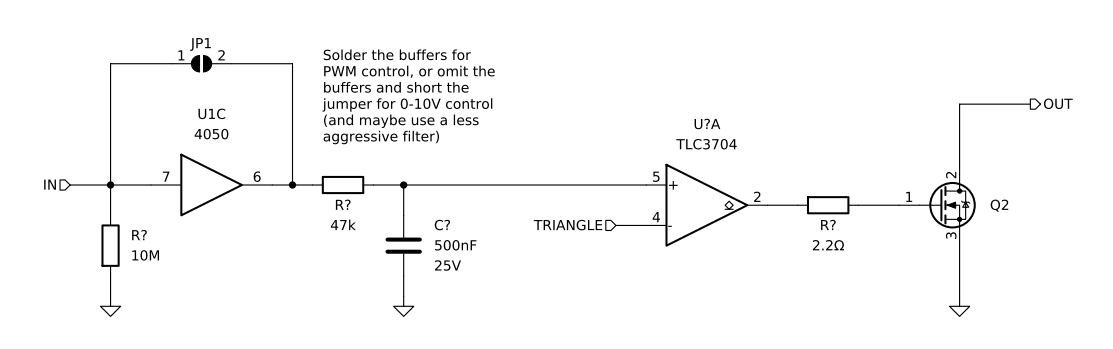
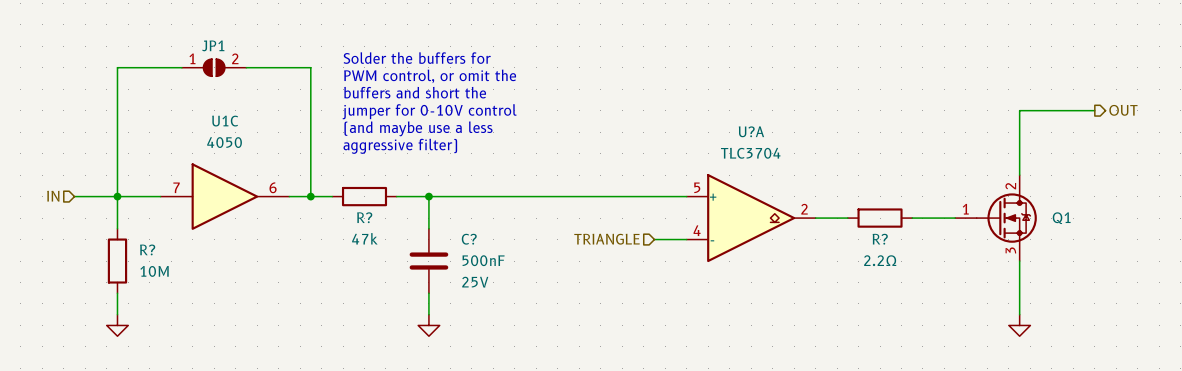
Q2 name: Q2 (999, 205) -> Q1 (1061, 218)

